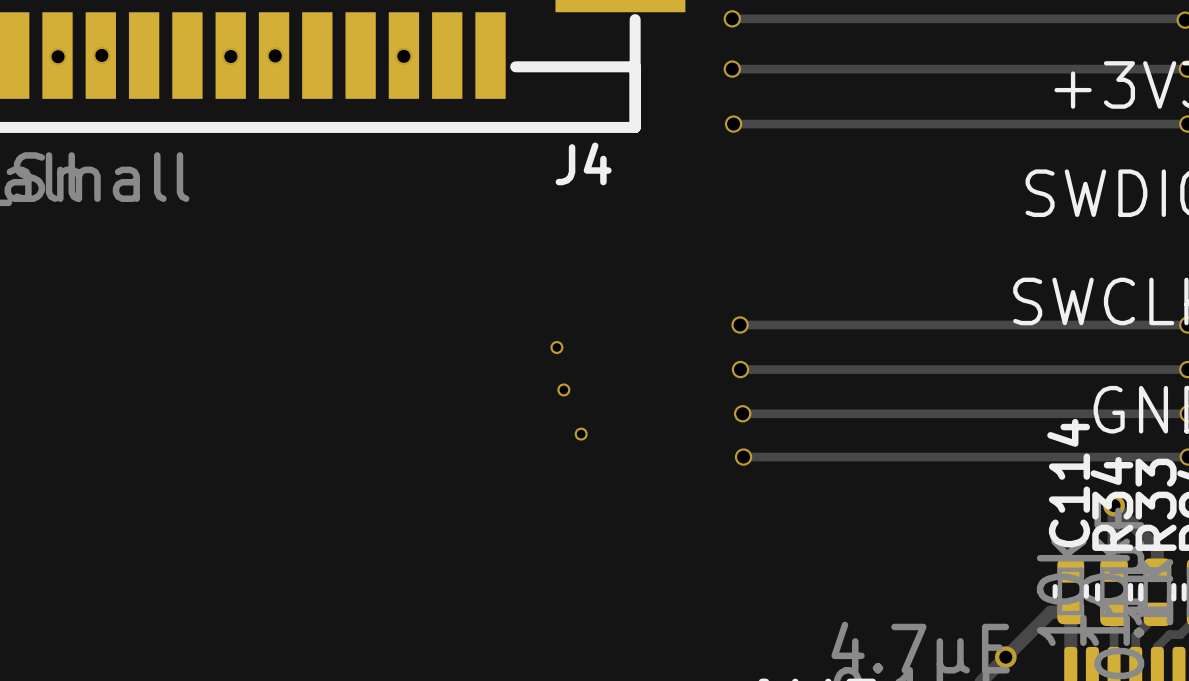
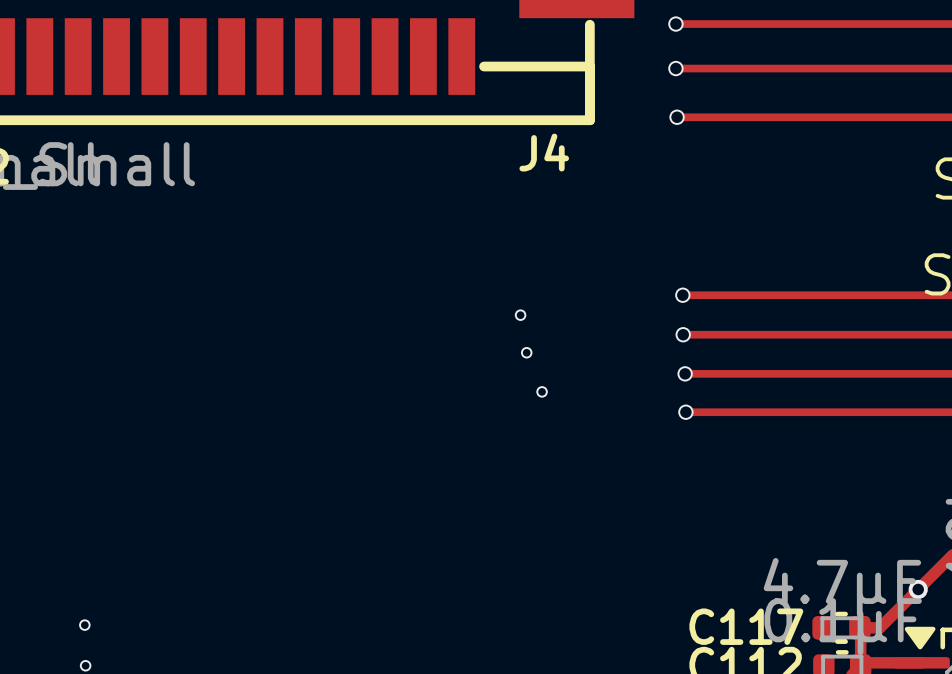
via: (101, 55) -> none
via: (275, 55) -> none
via: (58, 56) -> none
via: (230, 56) -> none
via: (403, 56) -> none

